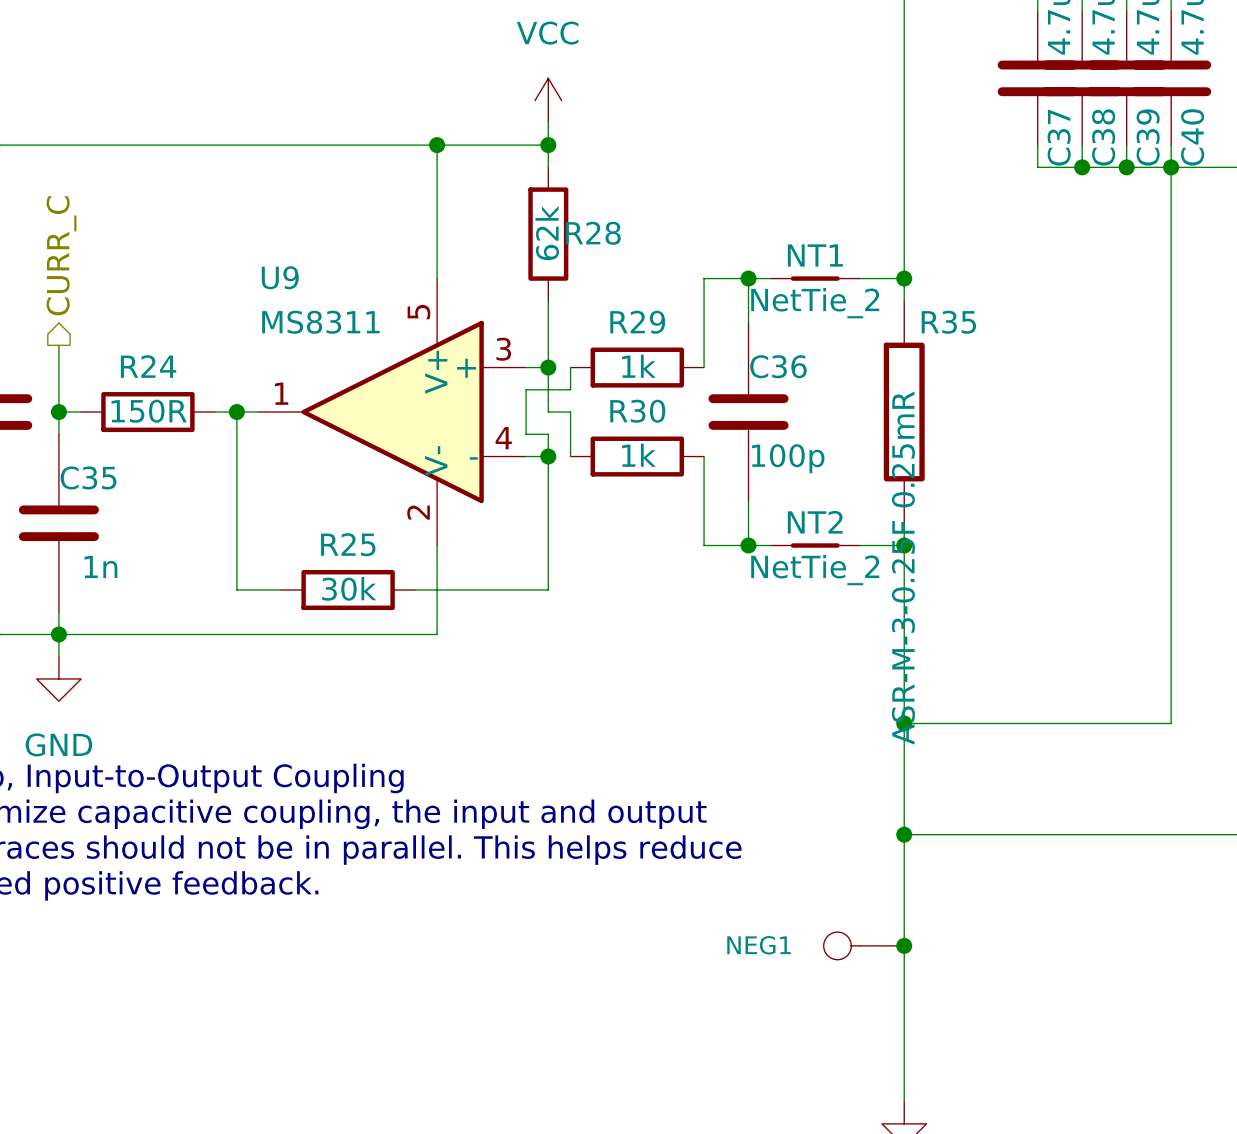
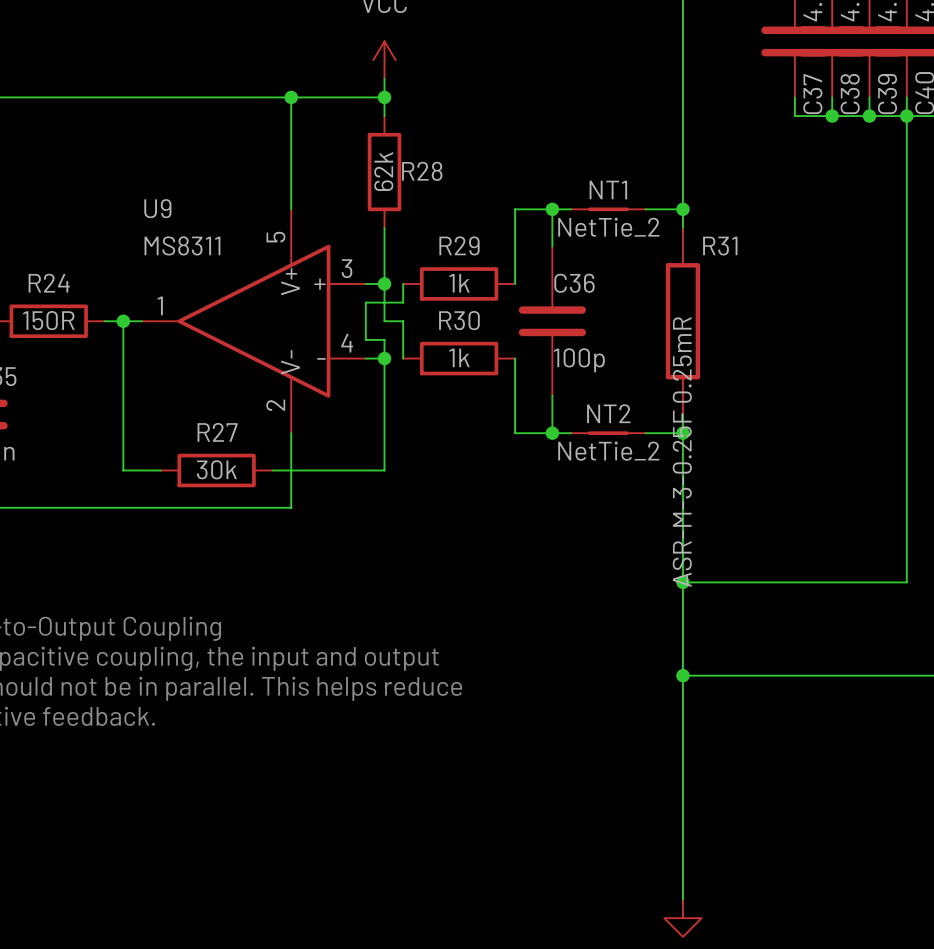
R35 name: R35 (948, 322) -> R31 (720, 246)
R25 name: R25 (348, 544) -> R27 (217, 432)
NEG1: (863, 945) -> none
junction: (904, 945) -> none

